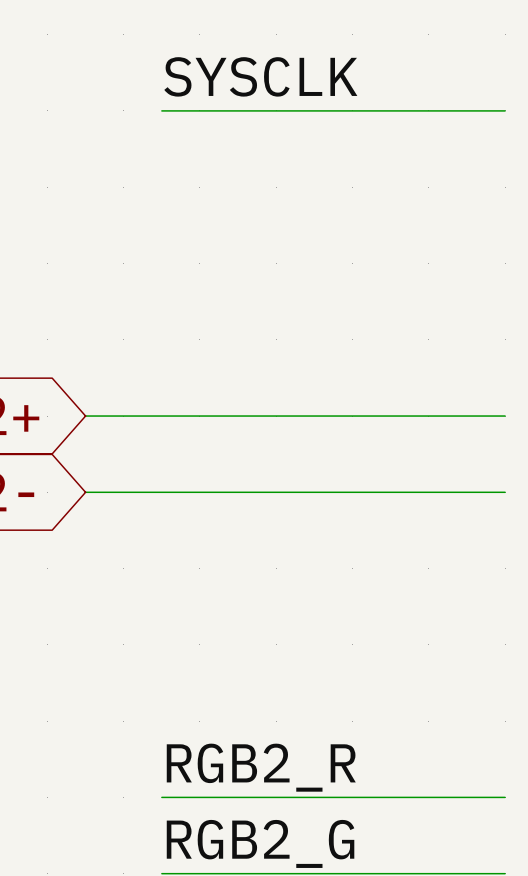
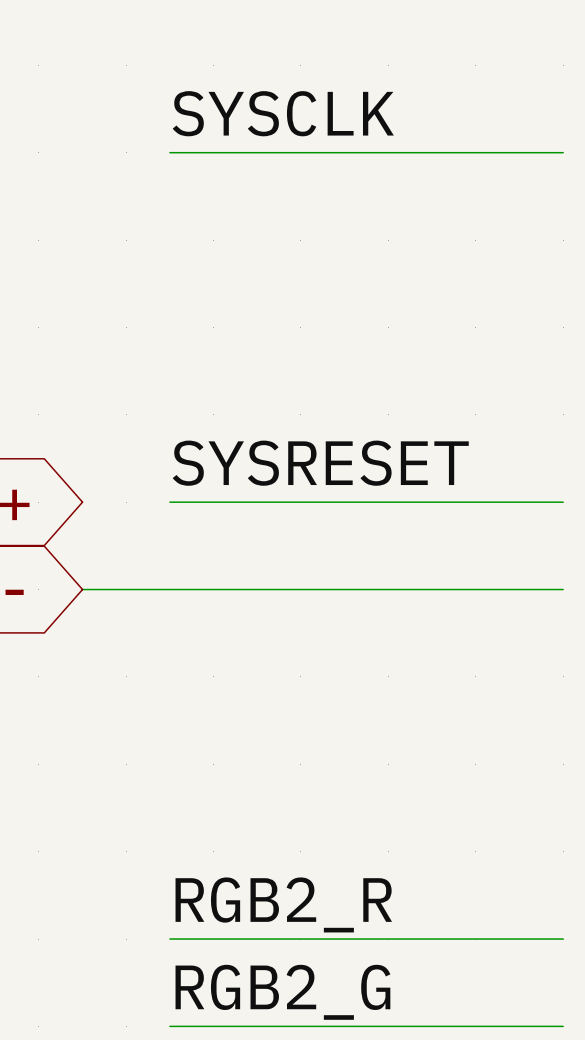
label: none -> SYSRESET (320, 463)
wire: (85, 416) (161, 416) -> none

